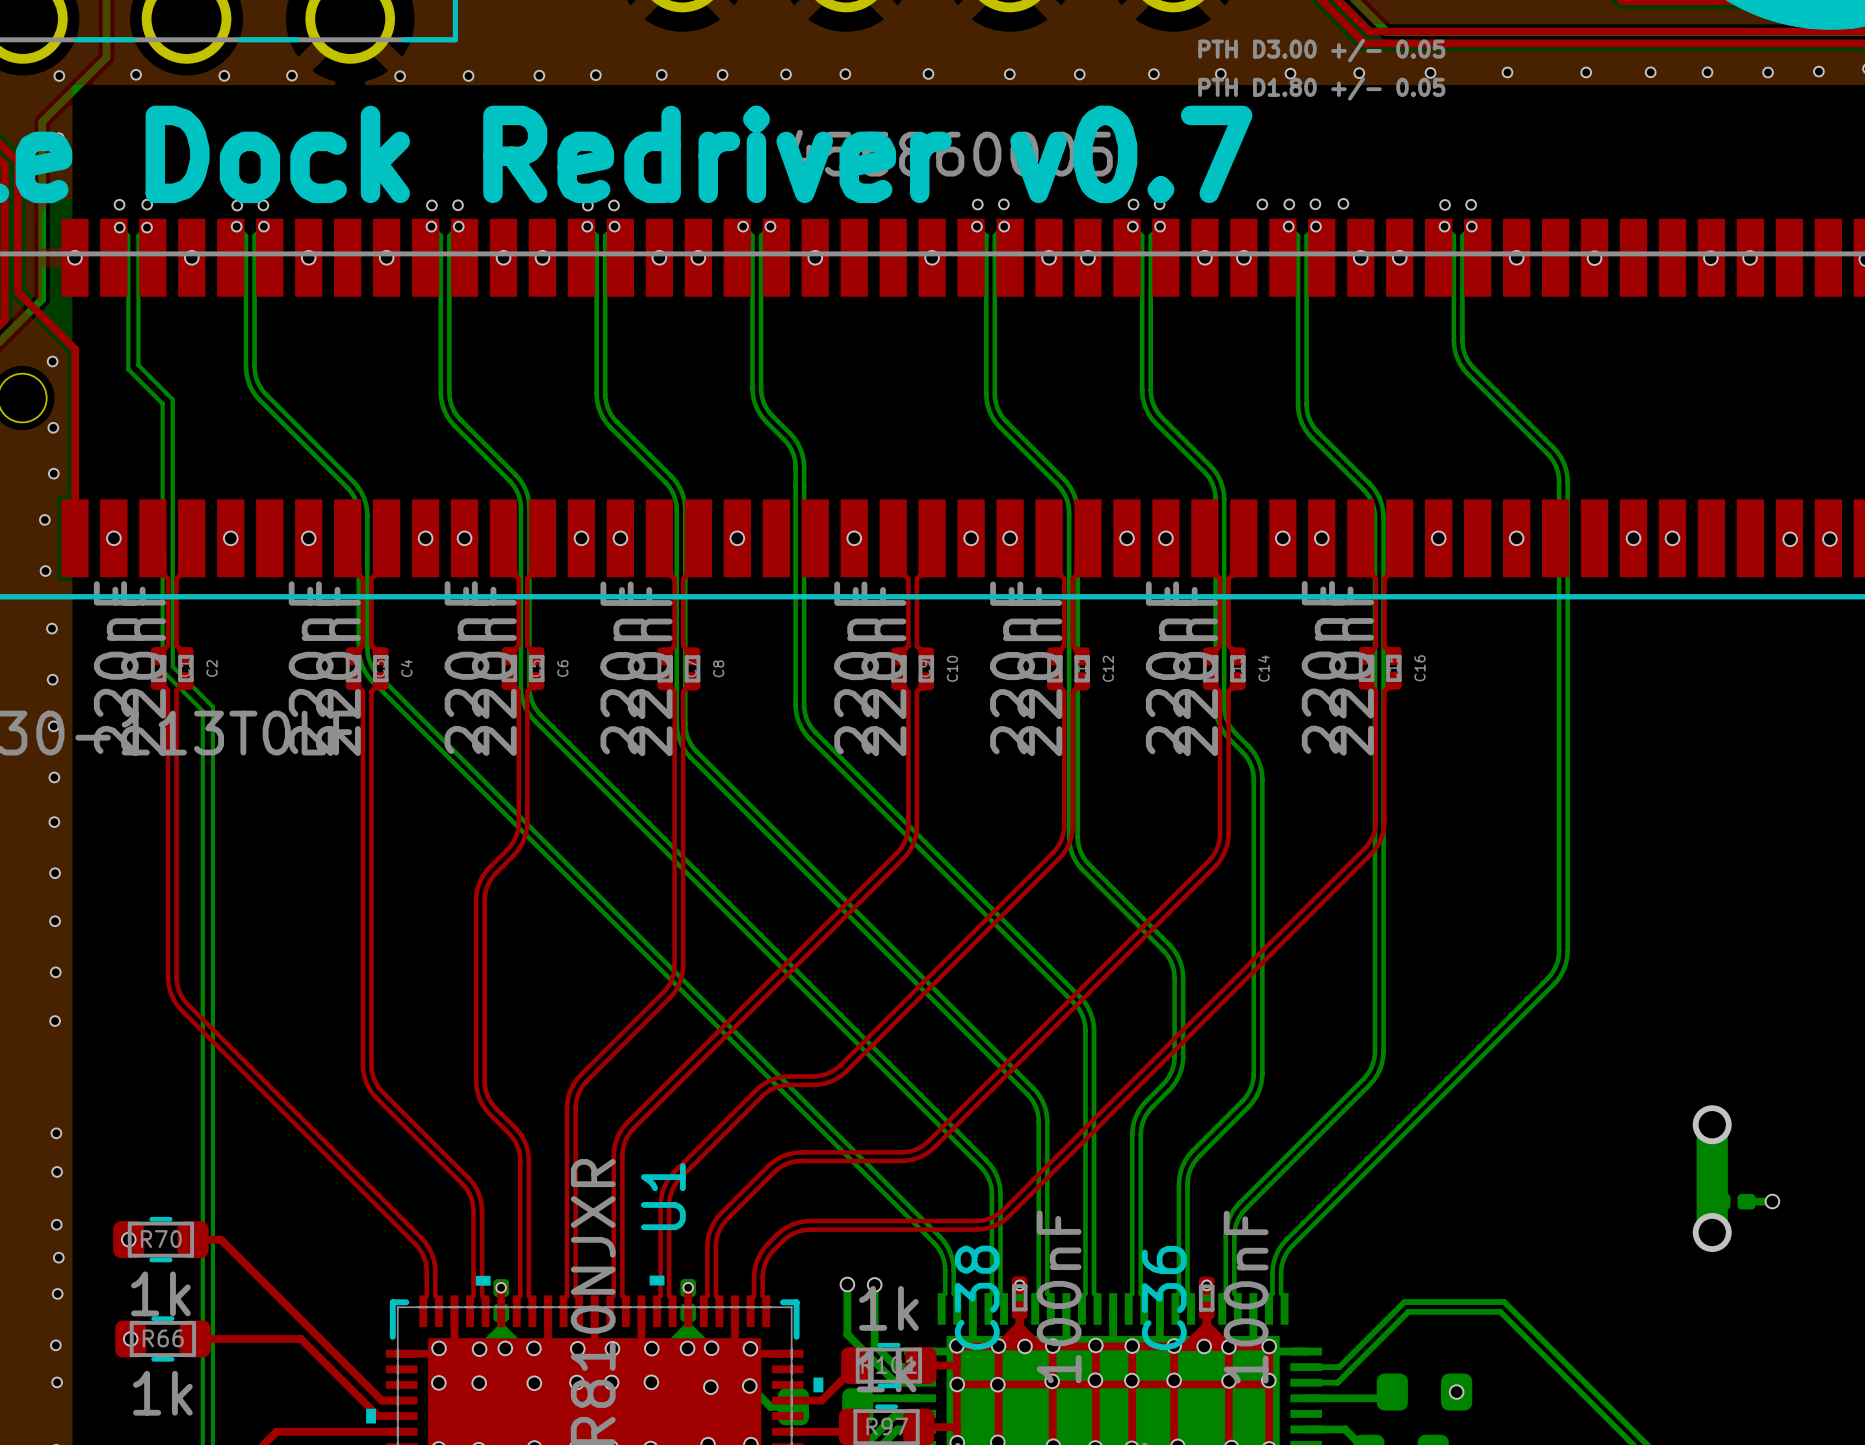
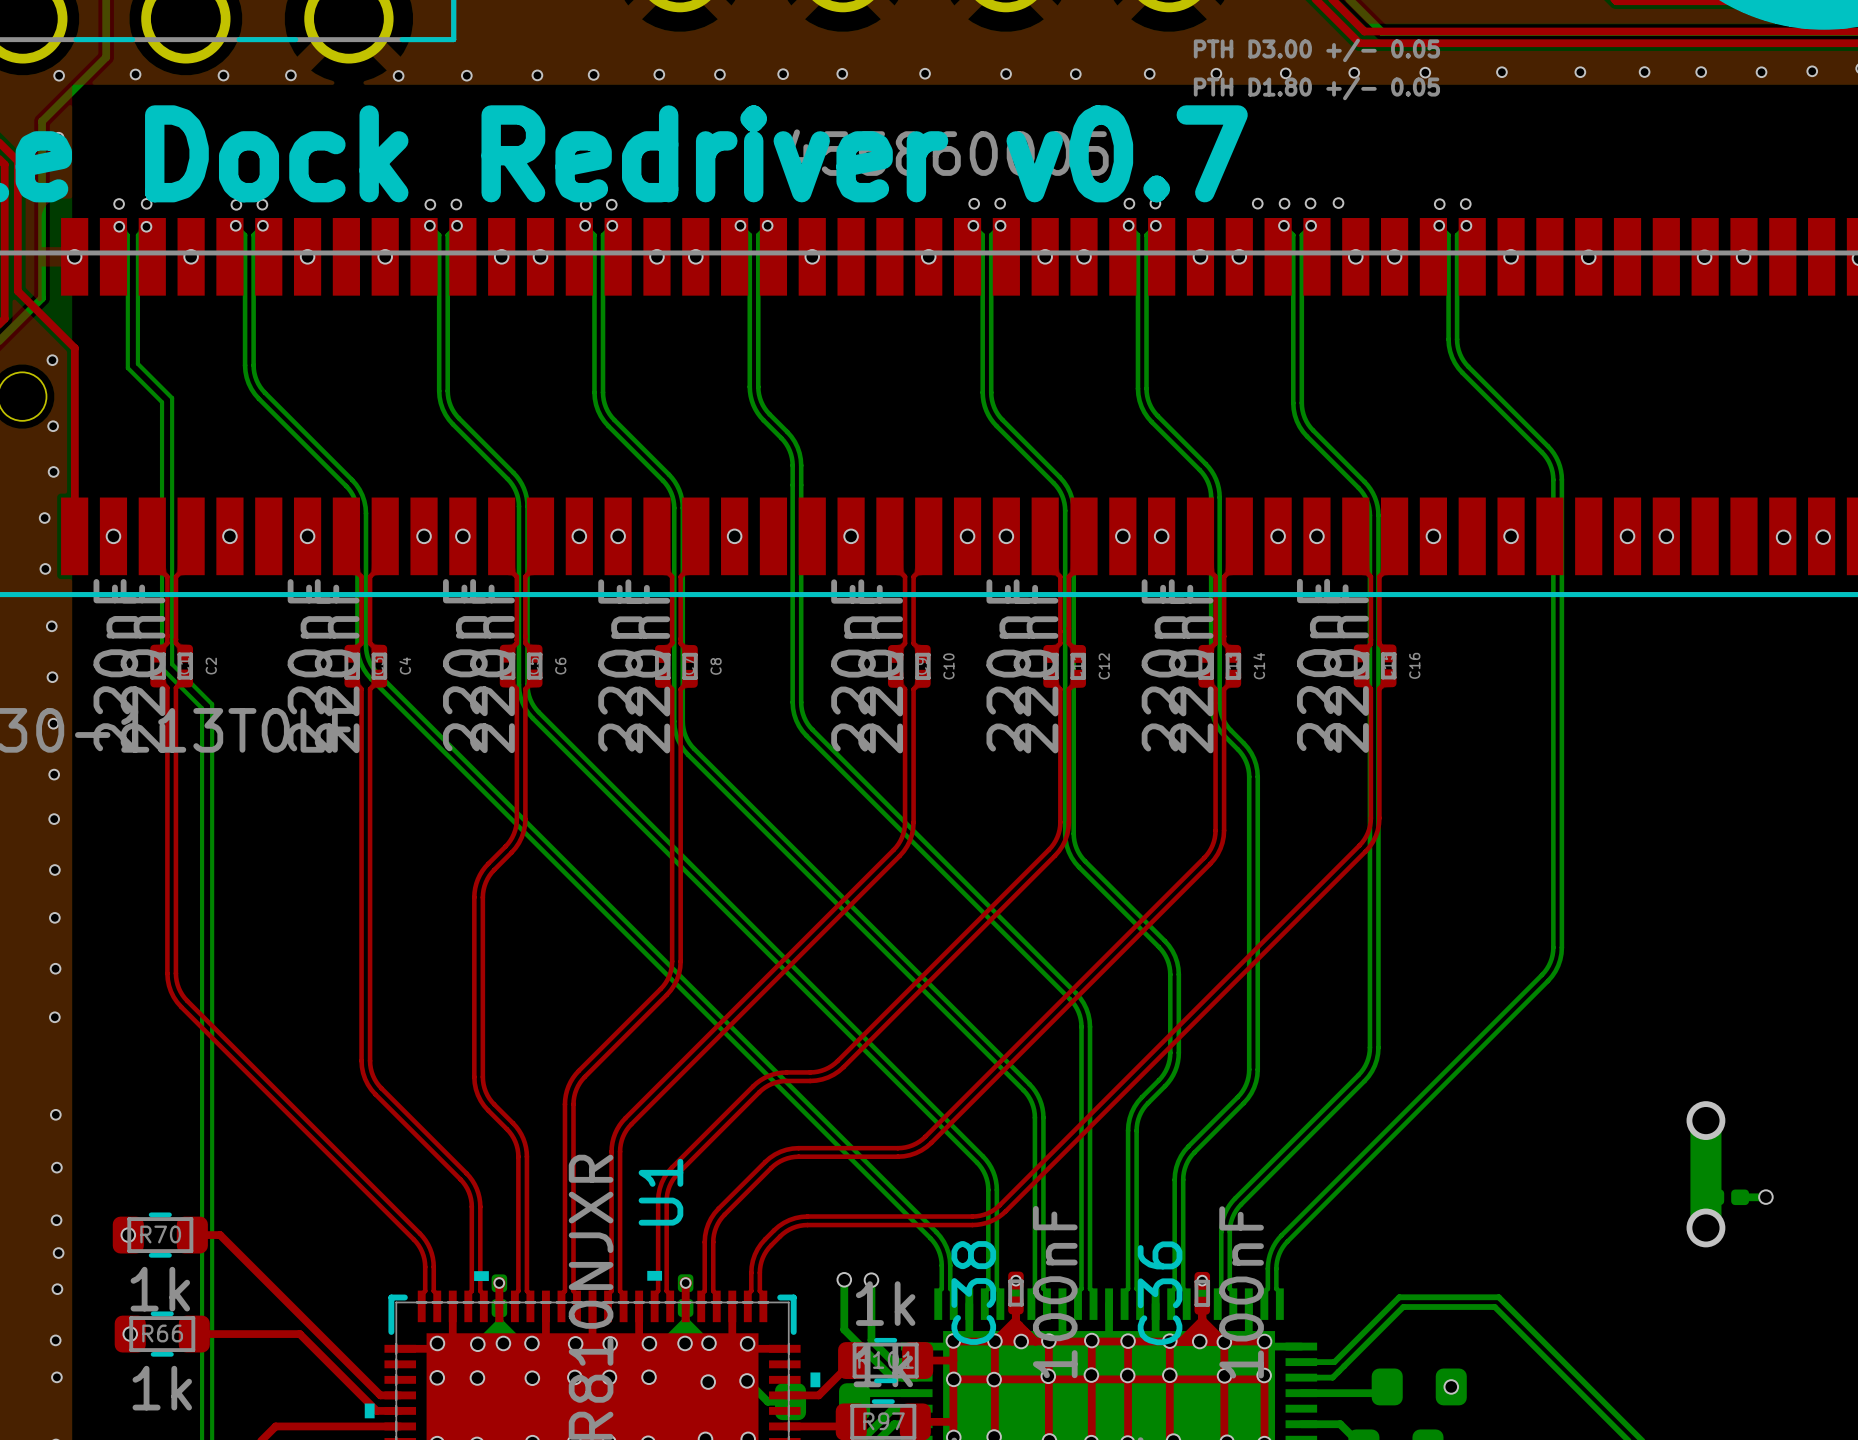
via position: (56, 1133) -> (55, 1114)

